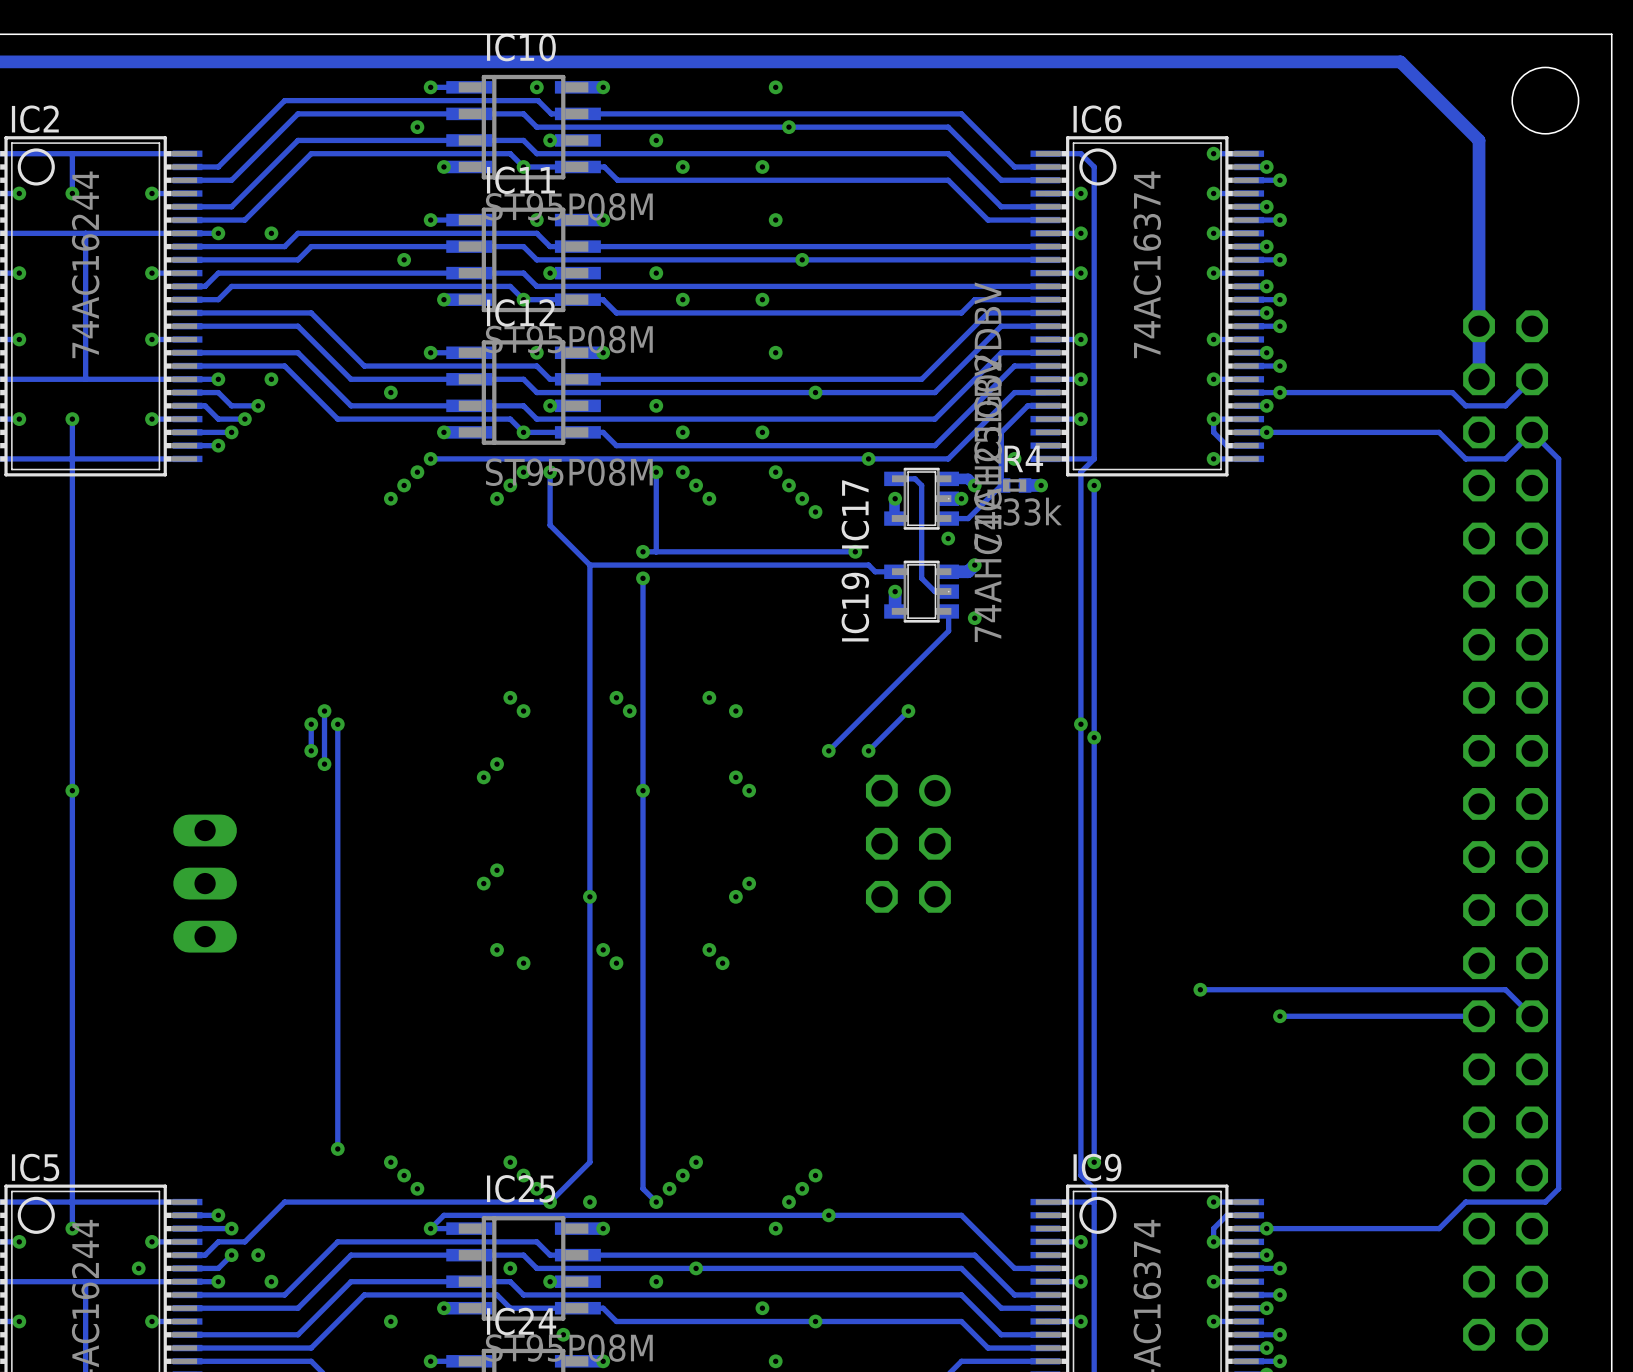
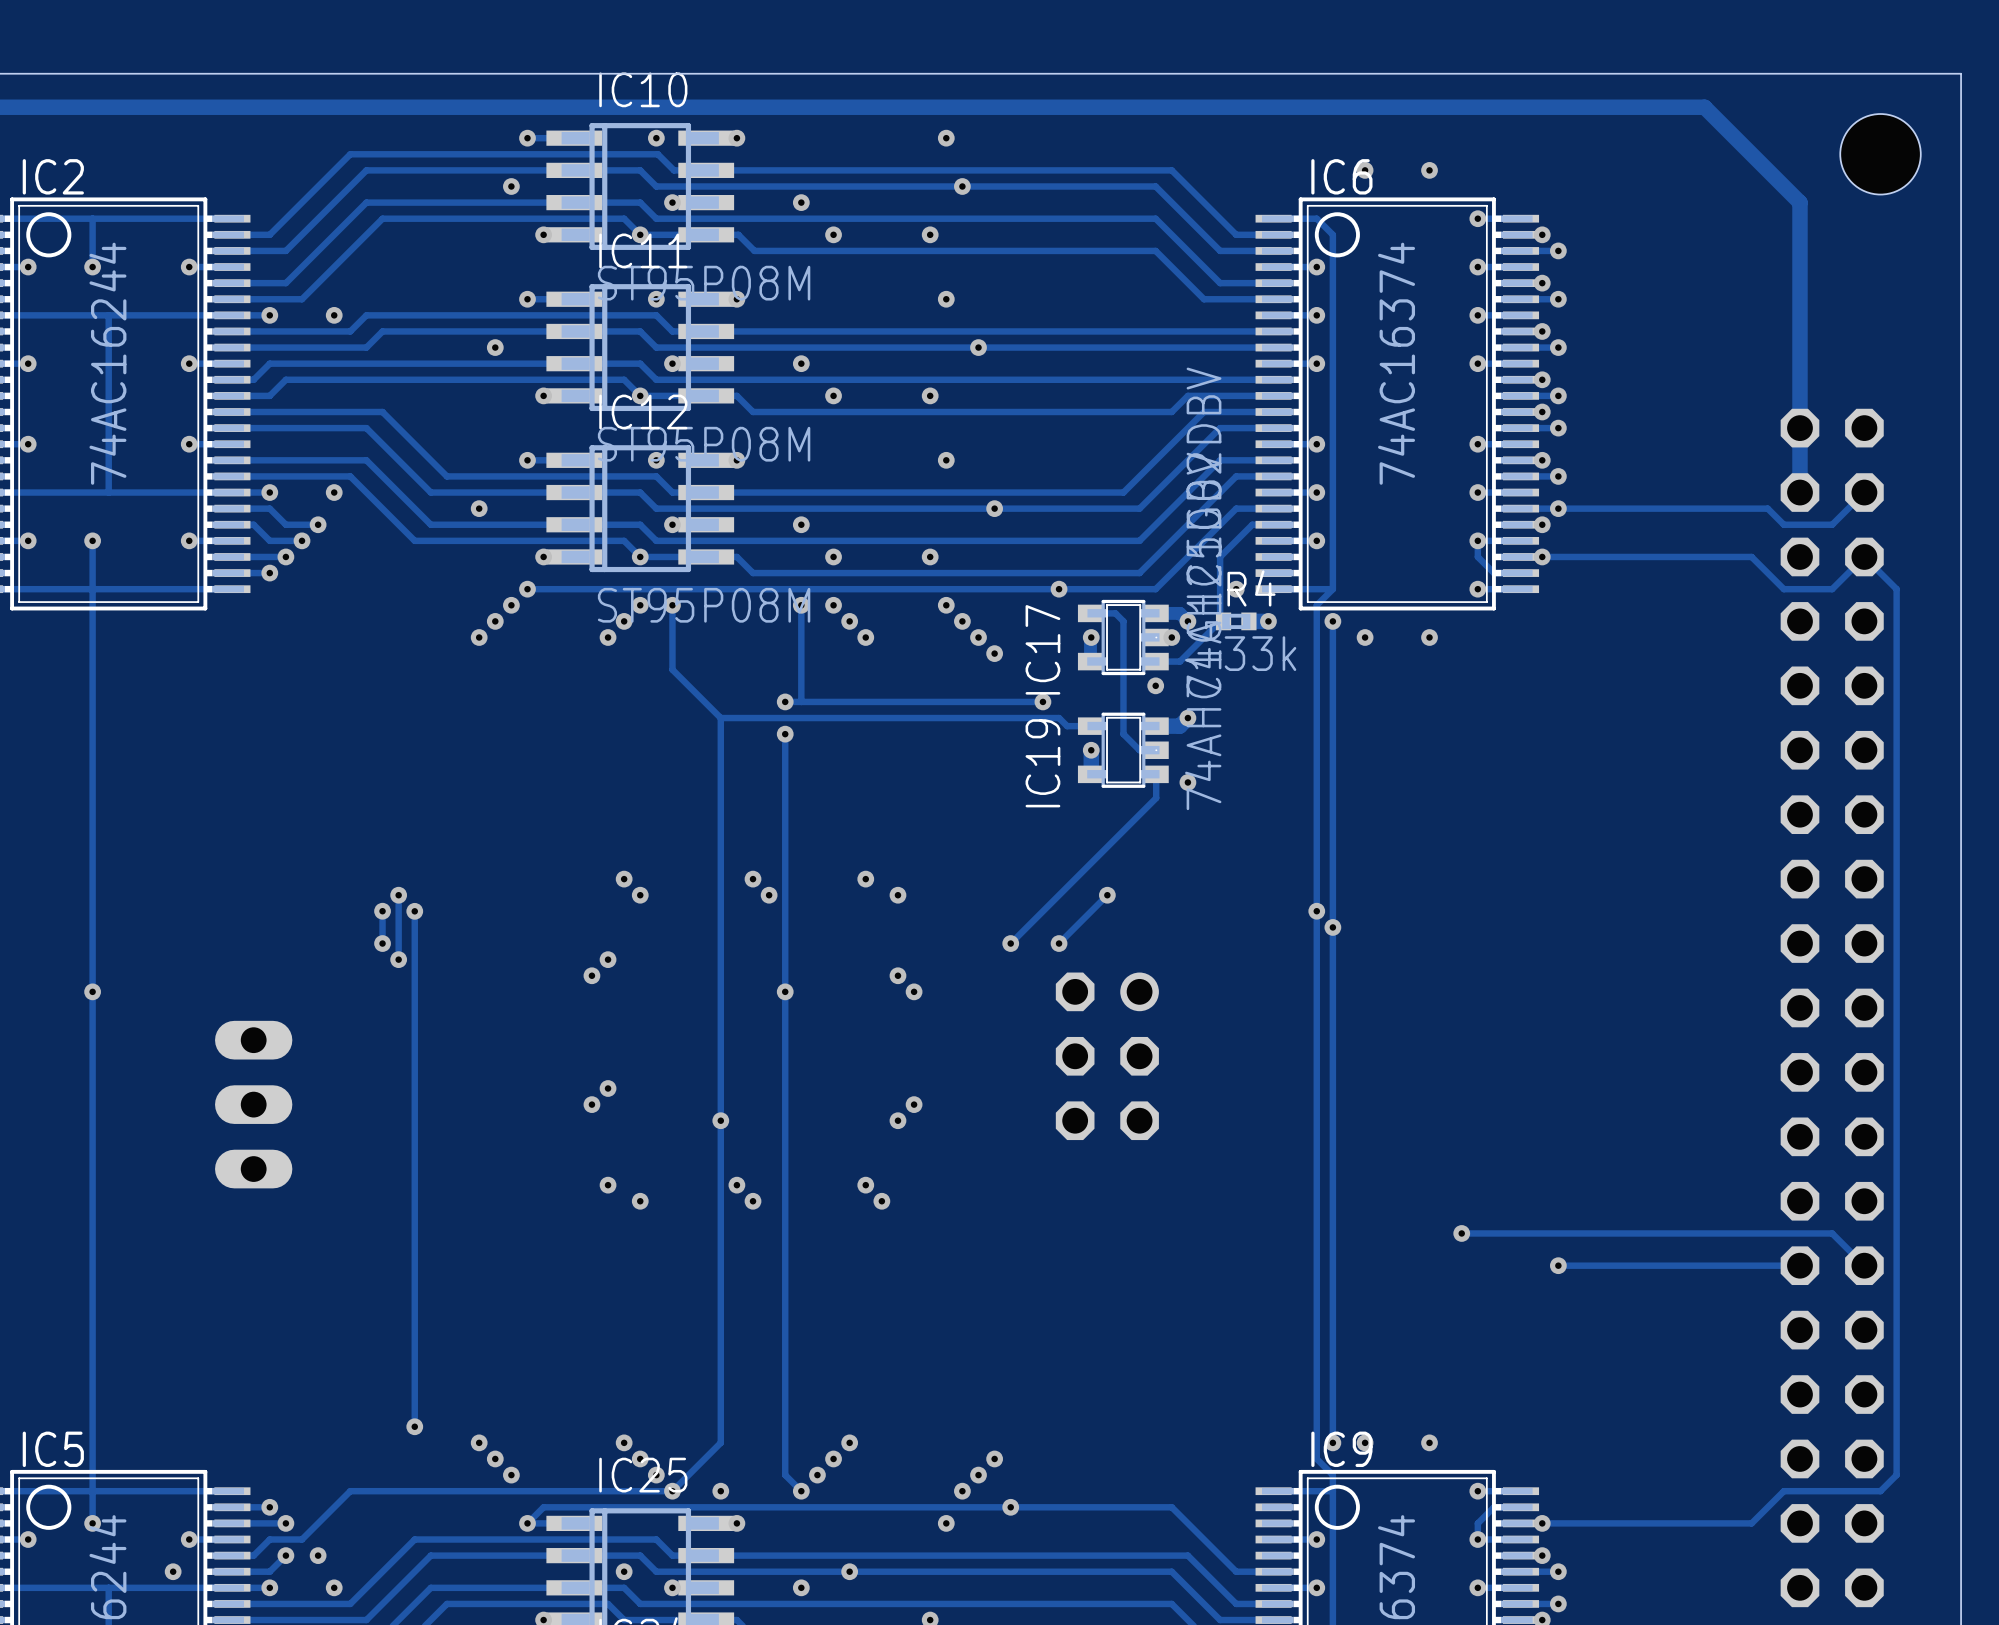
via: none -> (1365, 170)
via: none -> (1429, 170)
via: none -> (1365, 637)
via: none -> (1429, 637)
via: none -> (1365, 1442)
via: none -> (1429, 1442)

